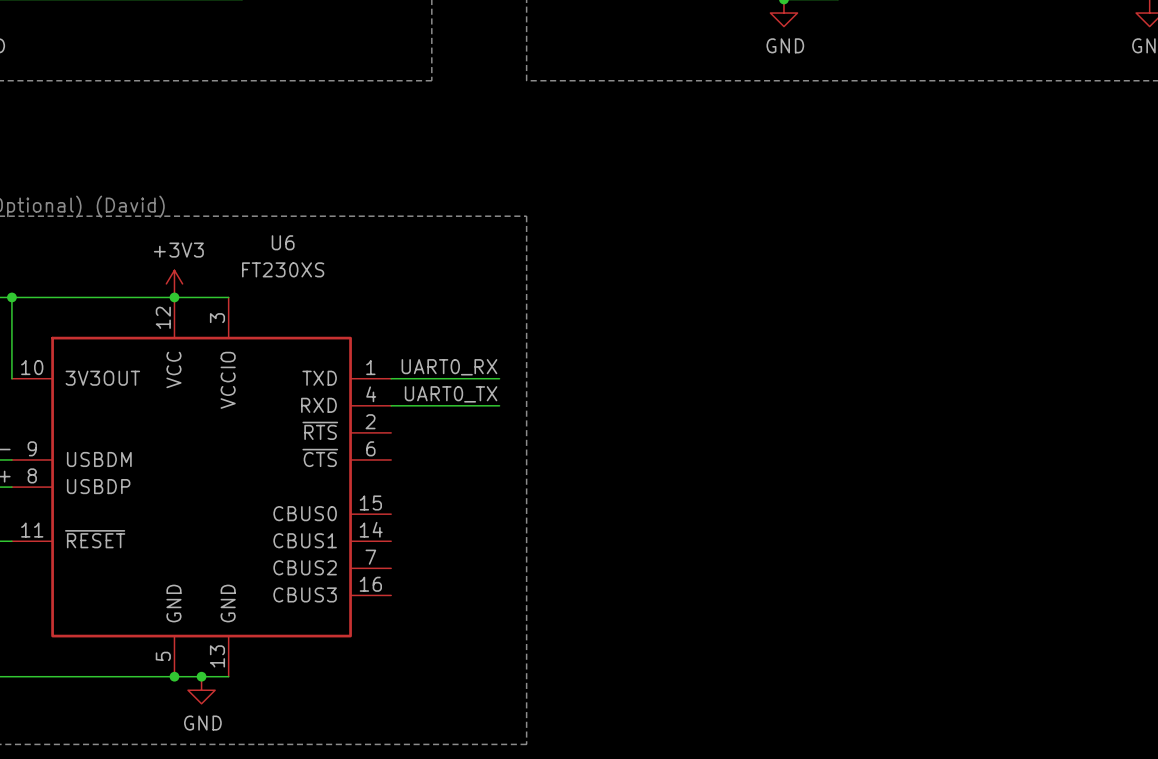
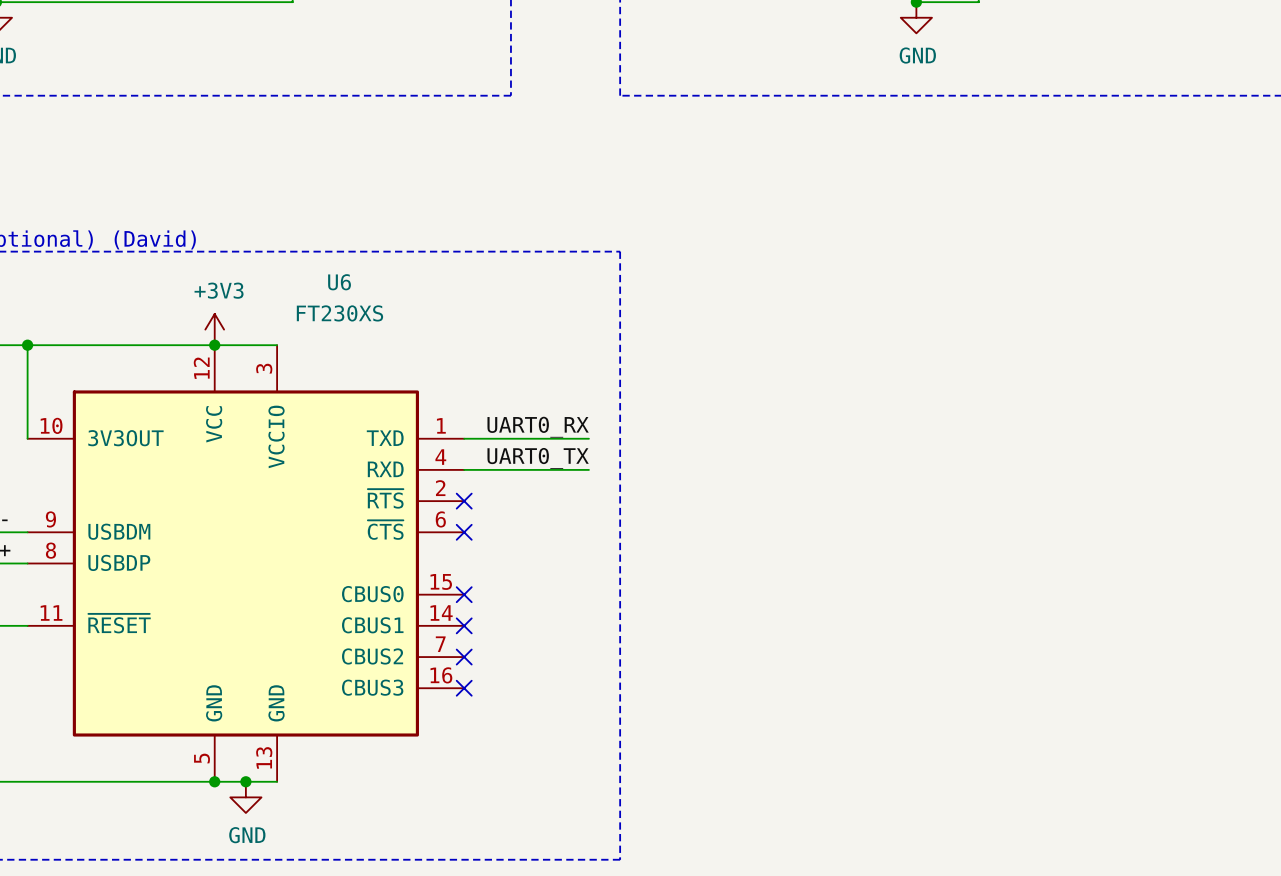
no-connect mark: none -> (464, 501)
no-connect mark: none -> (464, 532)
no-connect mark: none -> (464, 594)
no-connect mark: none -> (464, 625)
no-connect mark: none -> (464, 657)
no-connect mark: none -> (464, 688)

